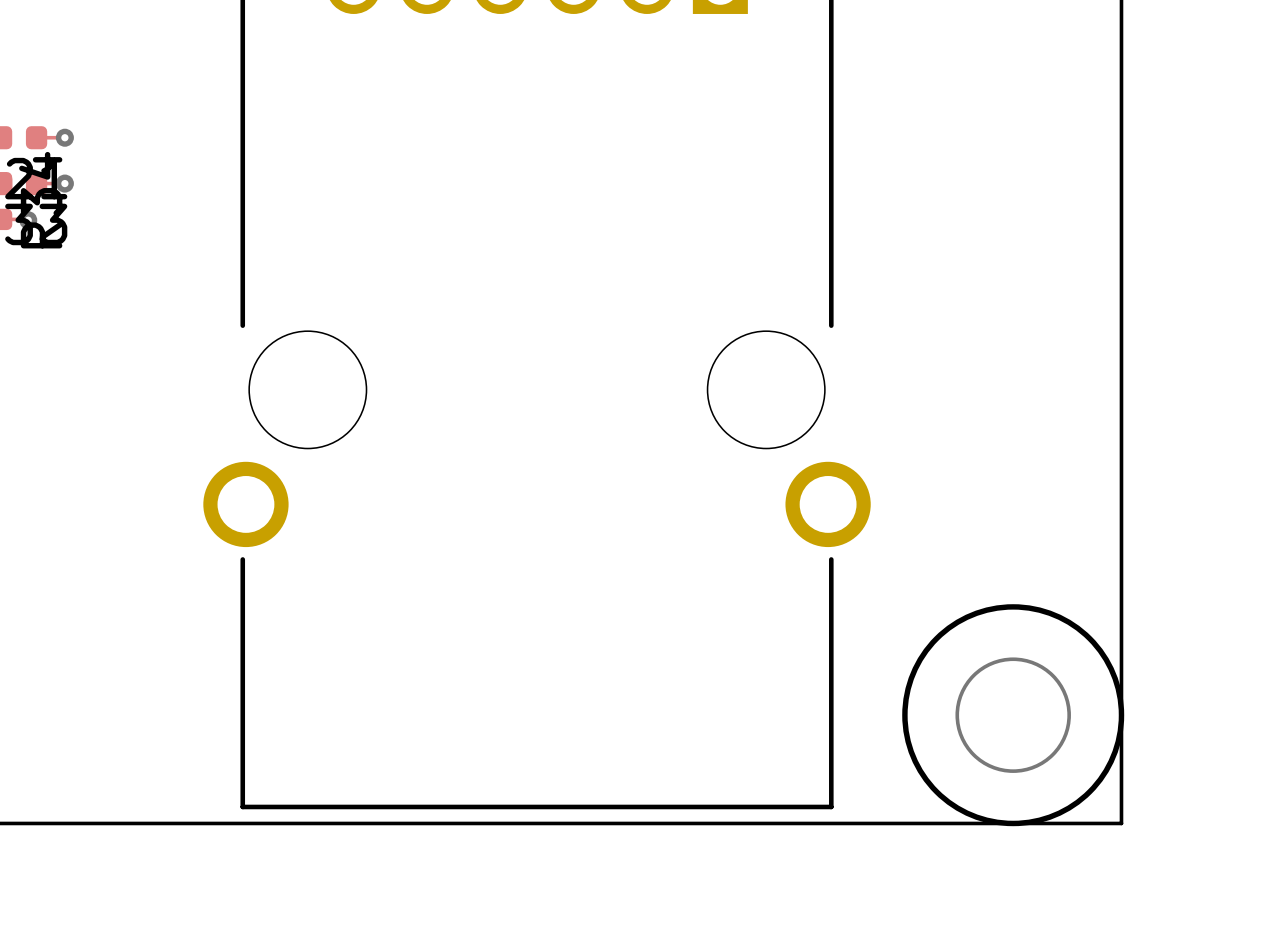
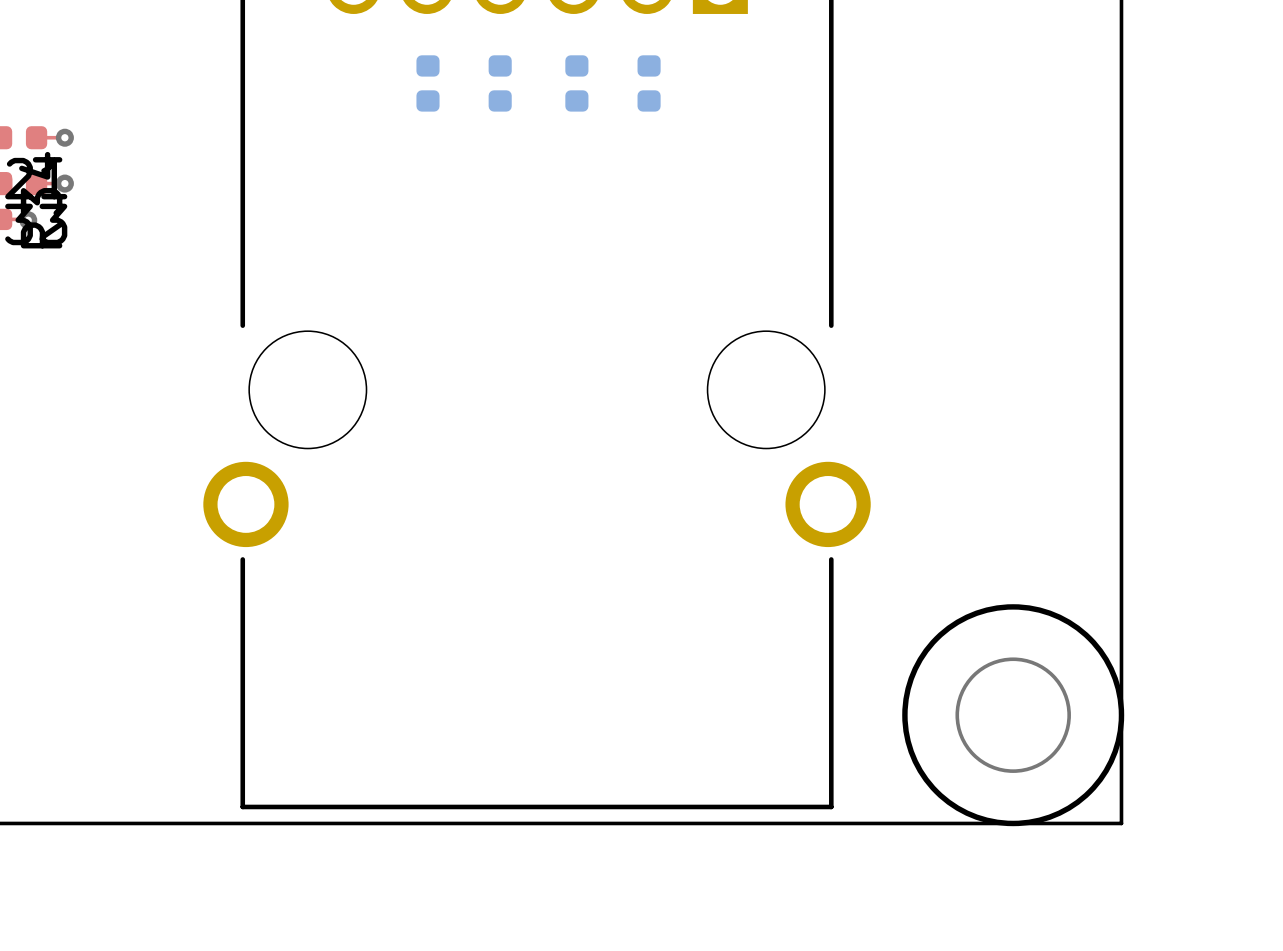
part: none -> (428, 83)
part: none -> (500, 83)
part: none -> (576, 83)
part: none -> (649, 83)

